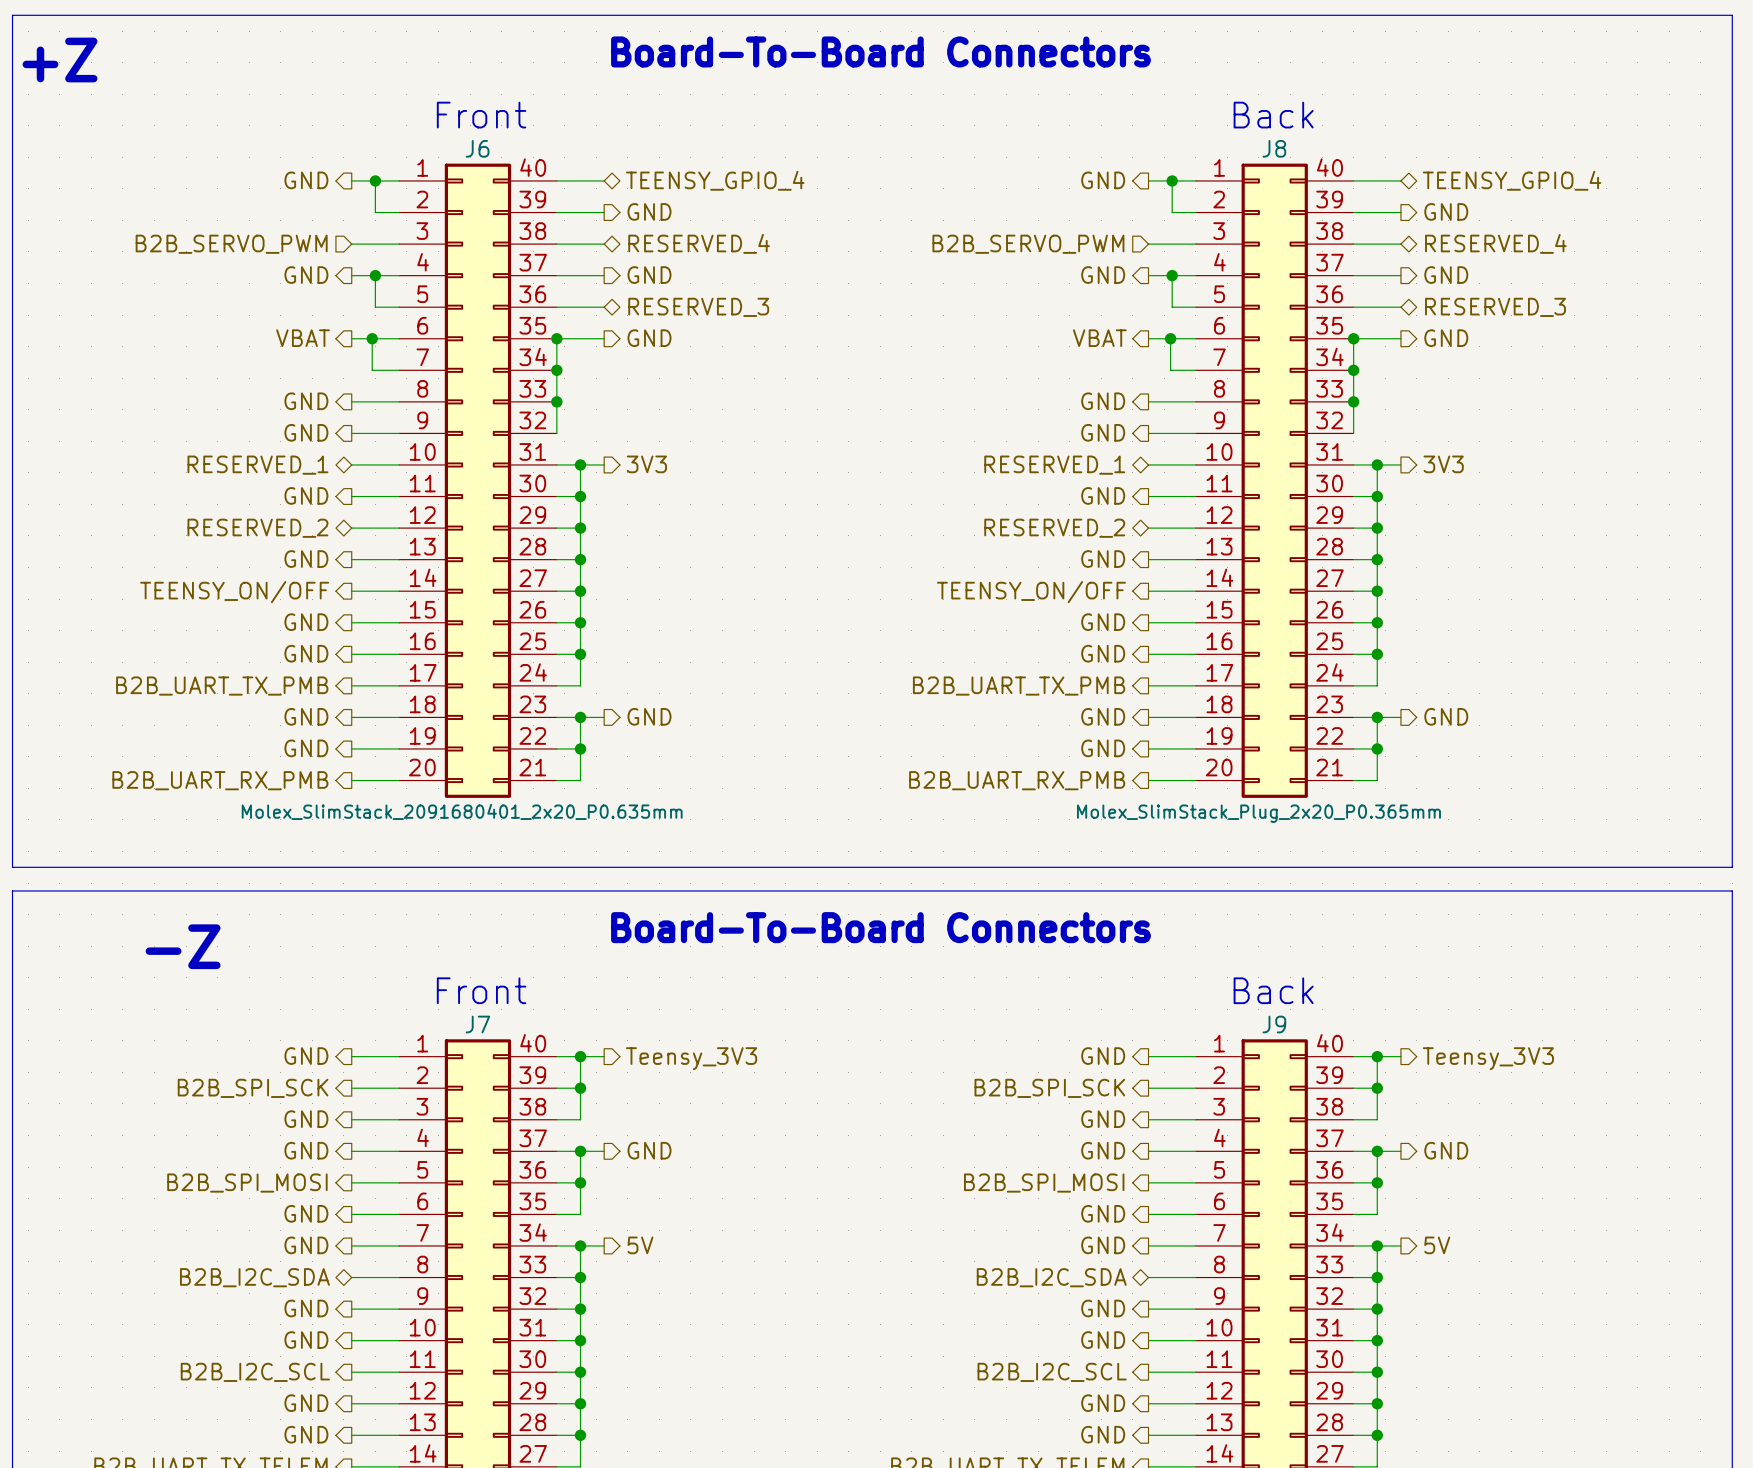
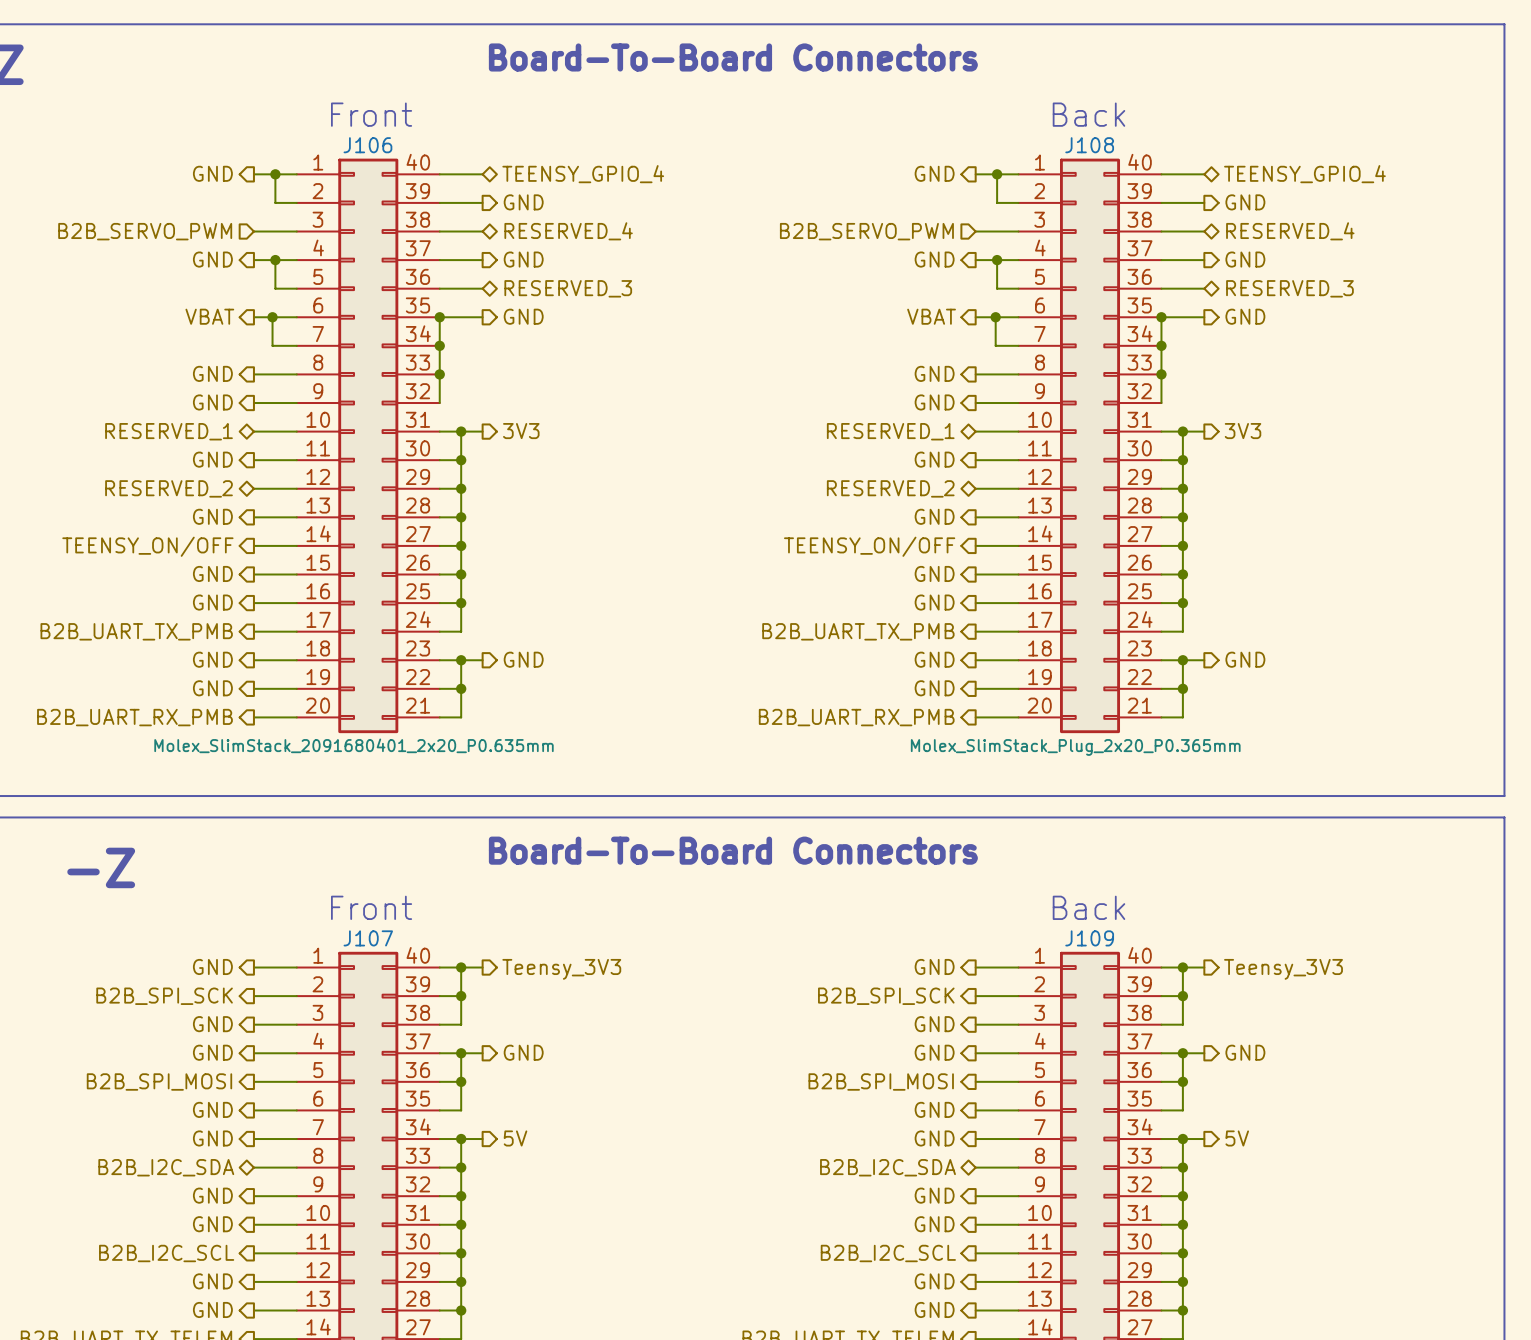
J6 name: J6 (477, 148) -> J106 (367, 145)
J8 name: J8 (1274, 148) -> J108 (1089, 145)
J7 name: J7 (477, 1024) -> J107 (368, 938)
J9 name: J9 (1274, 1024) -> J109 (1089, 938)

